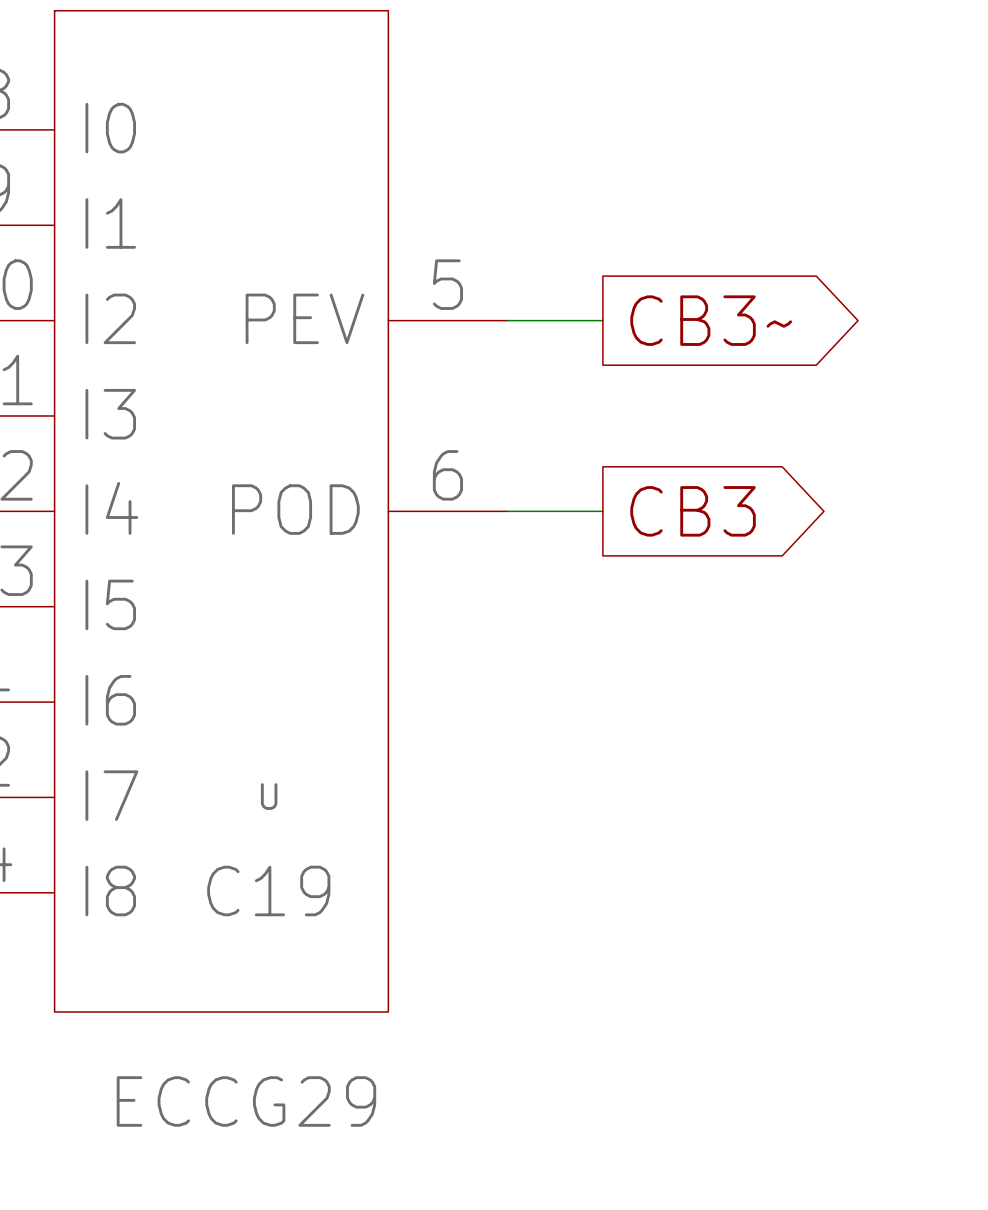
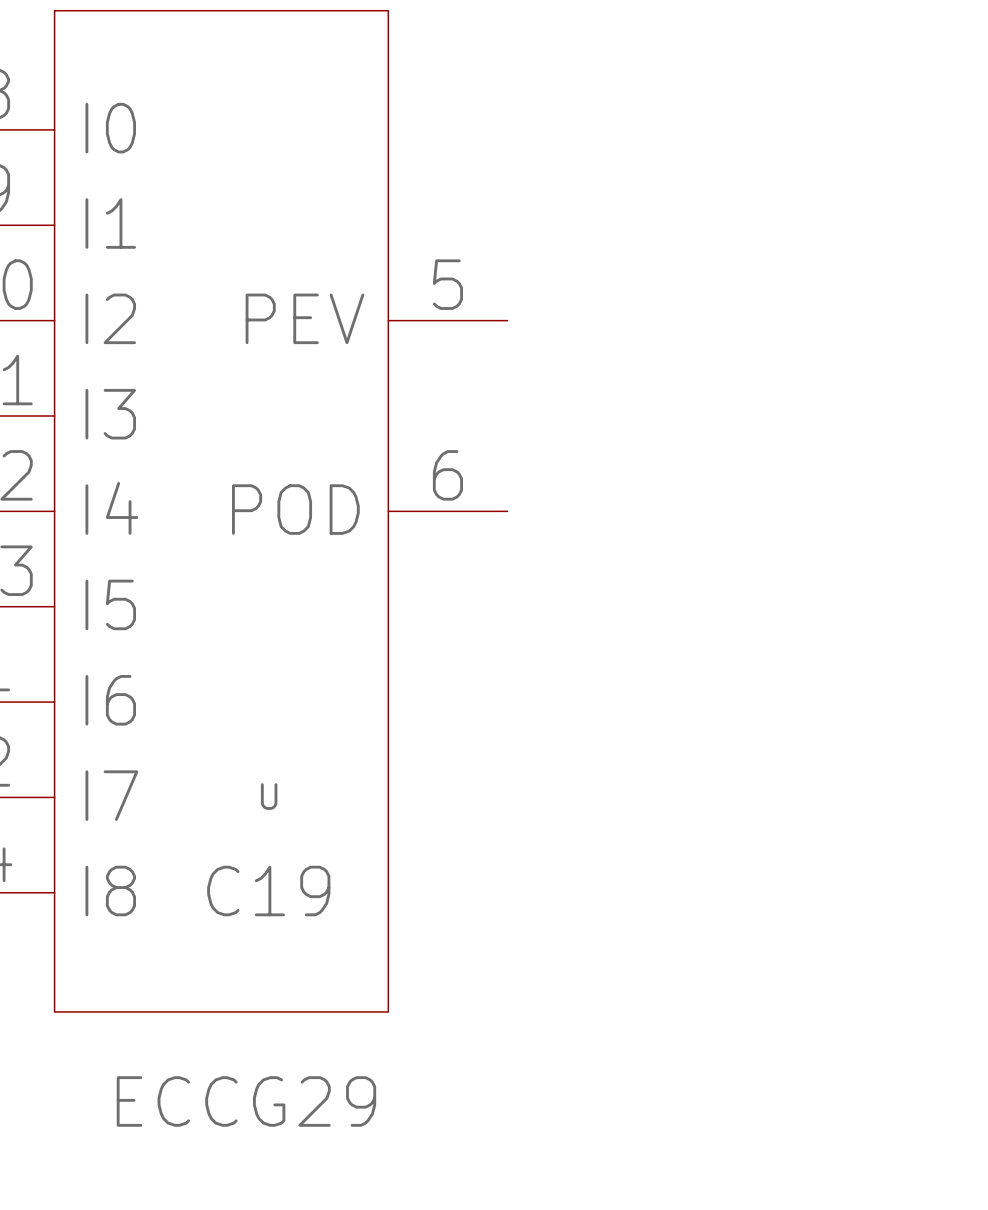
wire: (507, 320) (602, 320) -> none
global label: CB3~ (711, 320) -> none
wire: (507, 511) (602, 511) -> none
global label: CB3 (693, 511) -> none

